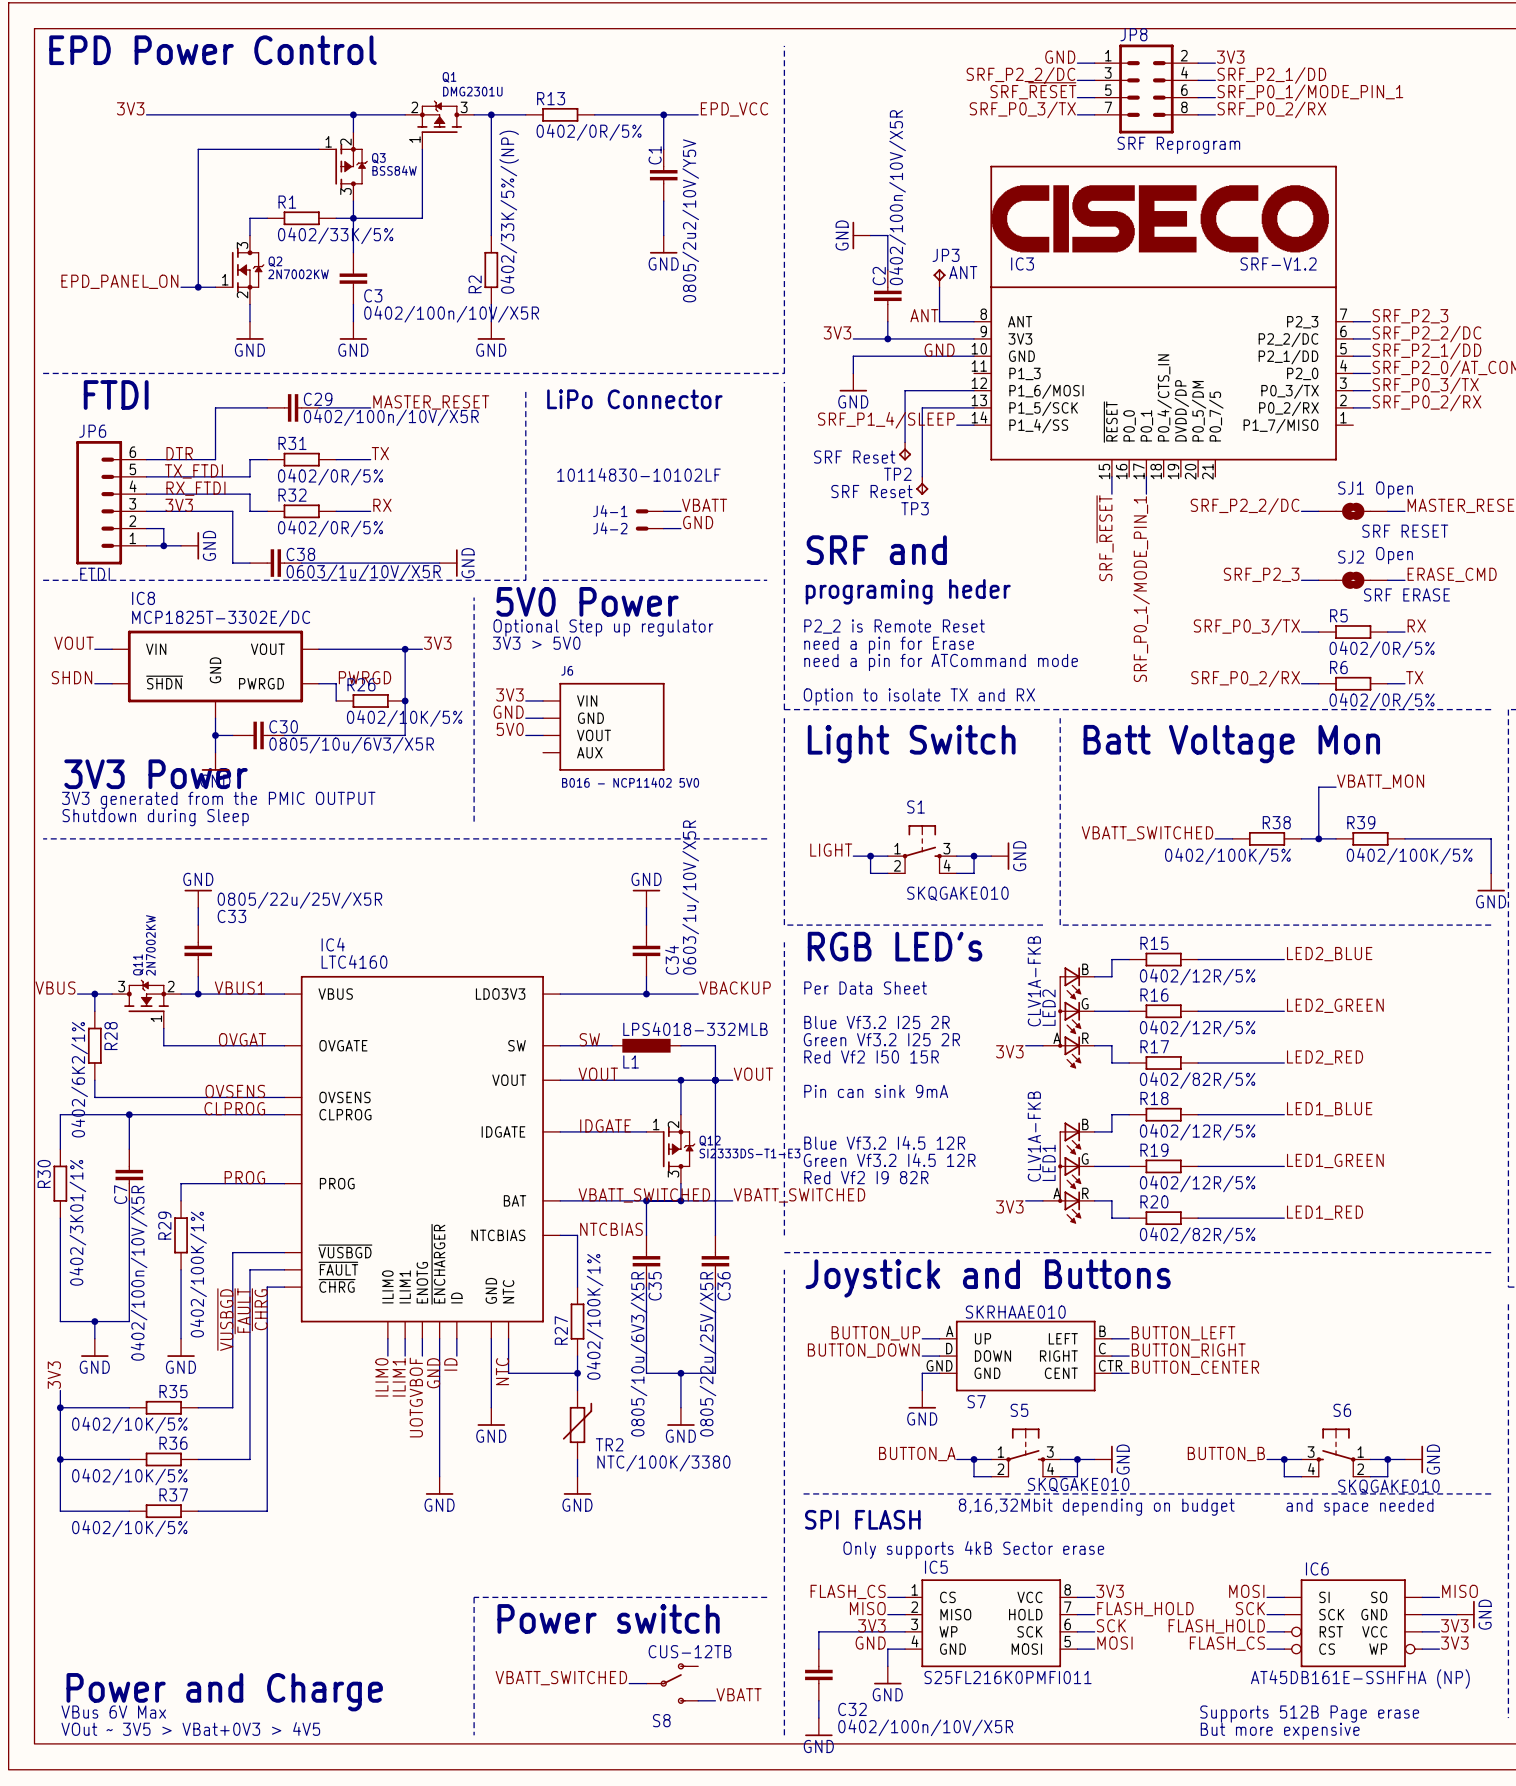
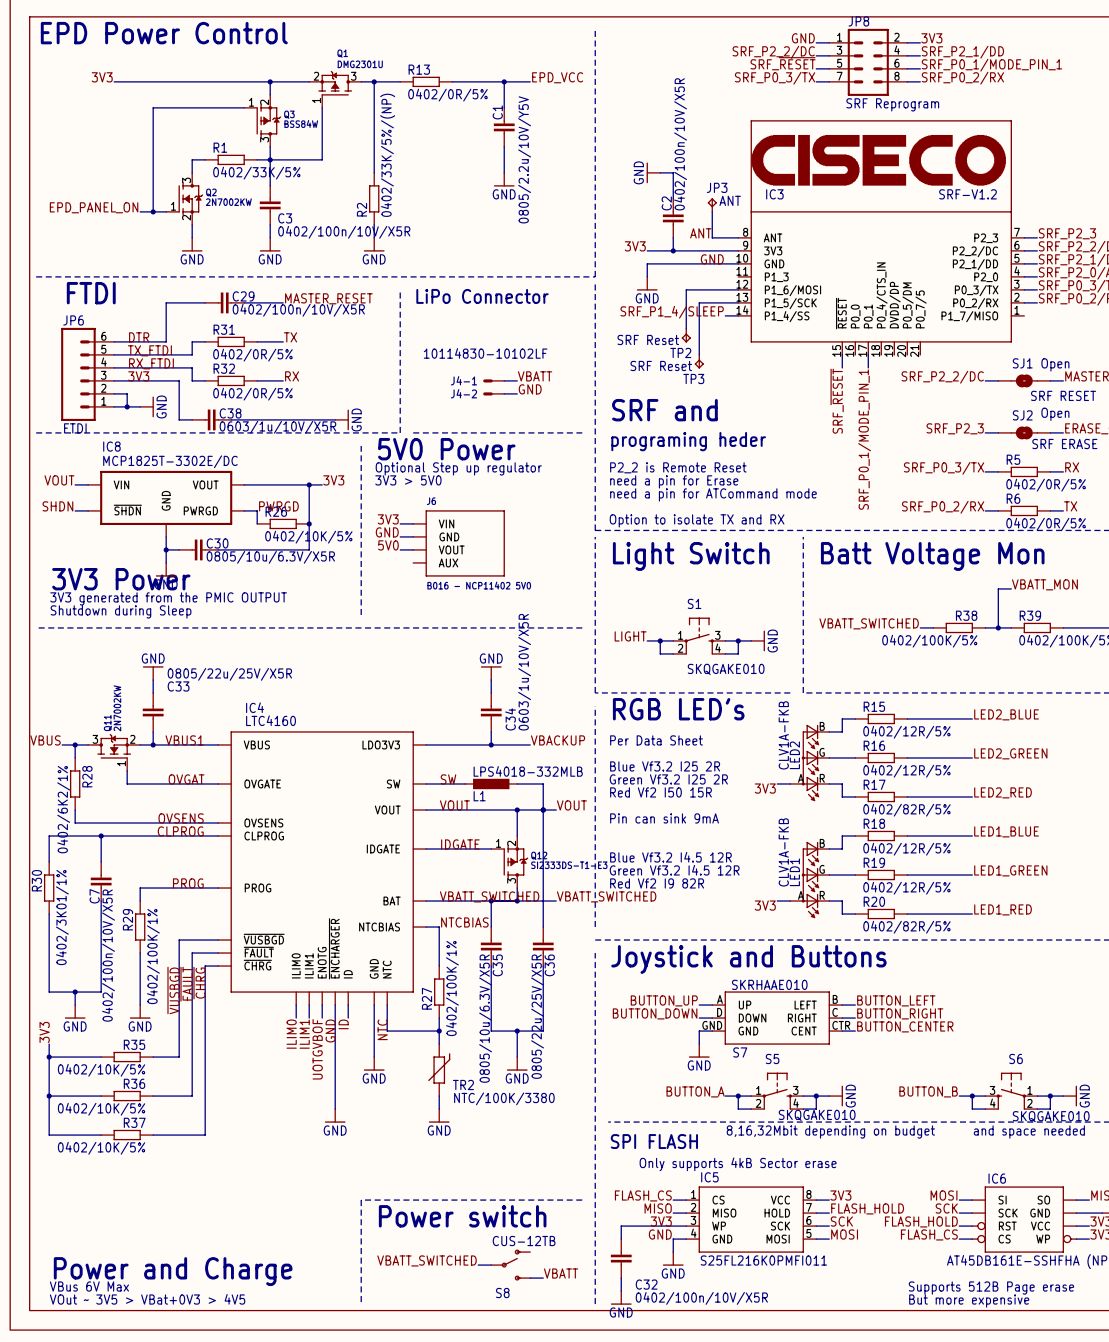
C1 value: 0805/2u2/10V/Y5V (690, 220) -> 0805/2.2u/10V/Y5V (524, 159)
C30 value: 0805/10u/6V3/X5R (351, 745) -> 0805/10u/6.3V/X5R (270, 557)
C35 value: 0805/10u/6V3/X5R (639, 1354) -> 0805/10u/6.3V/X5R (485, 1018)

